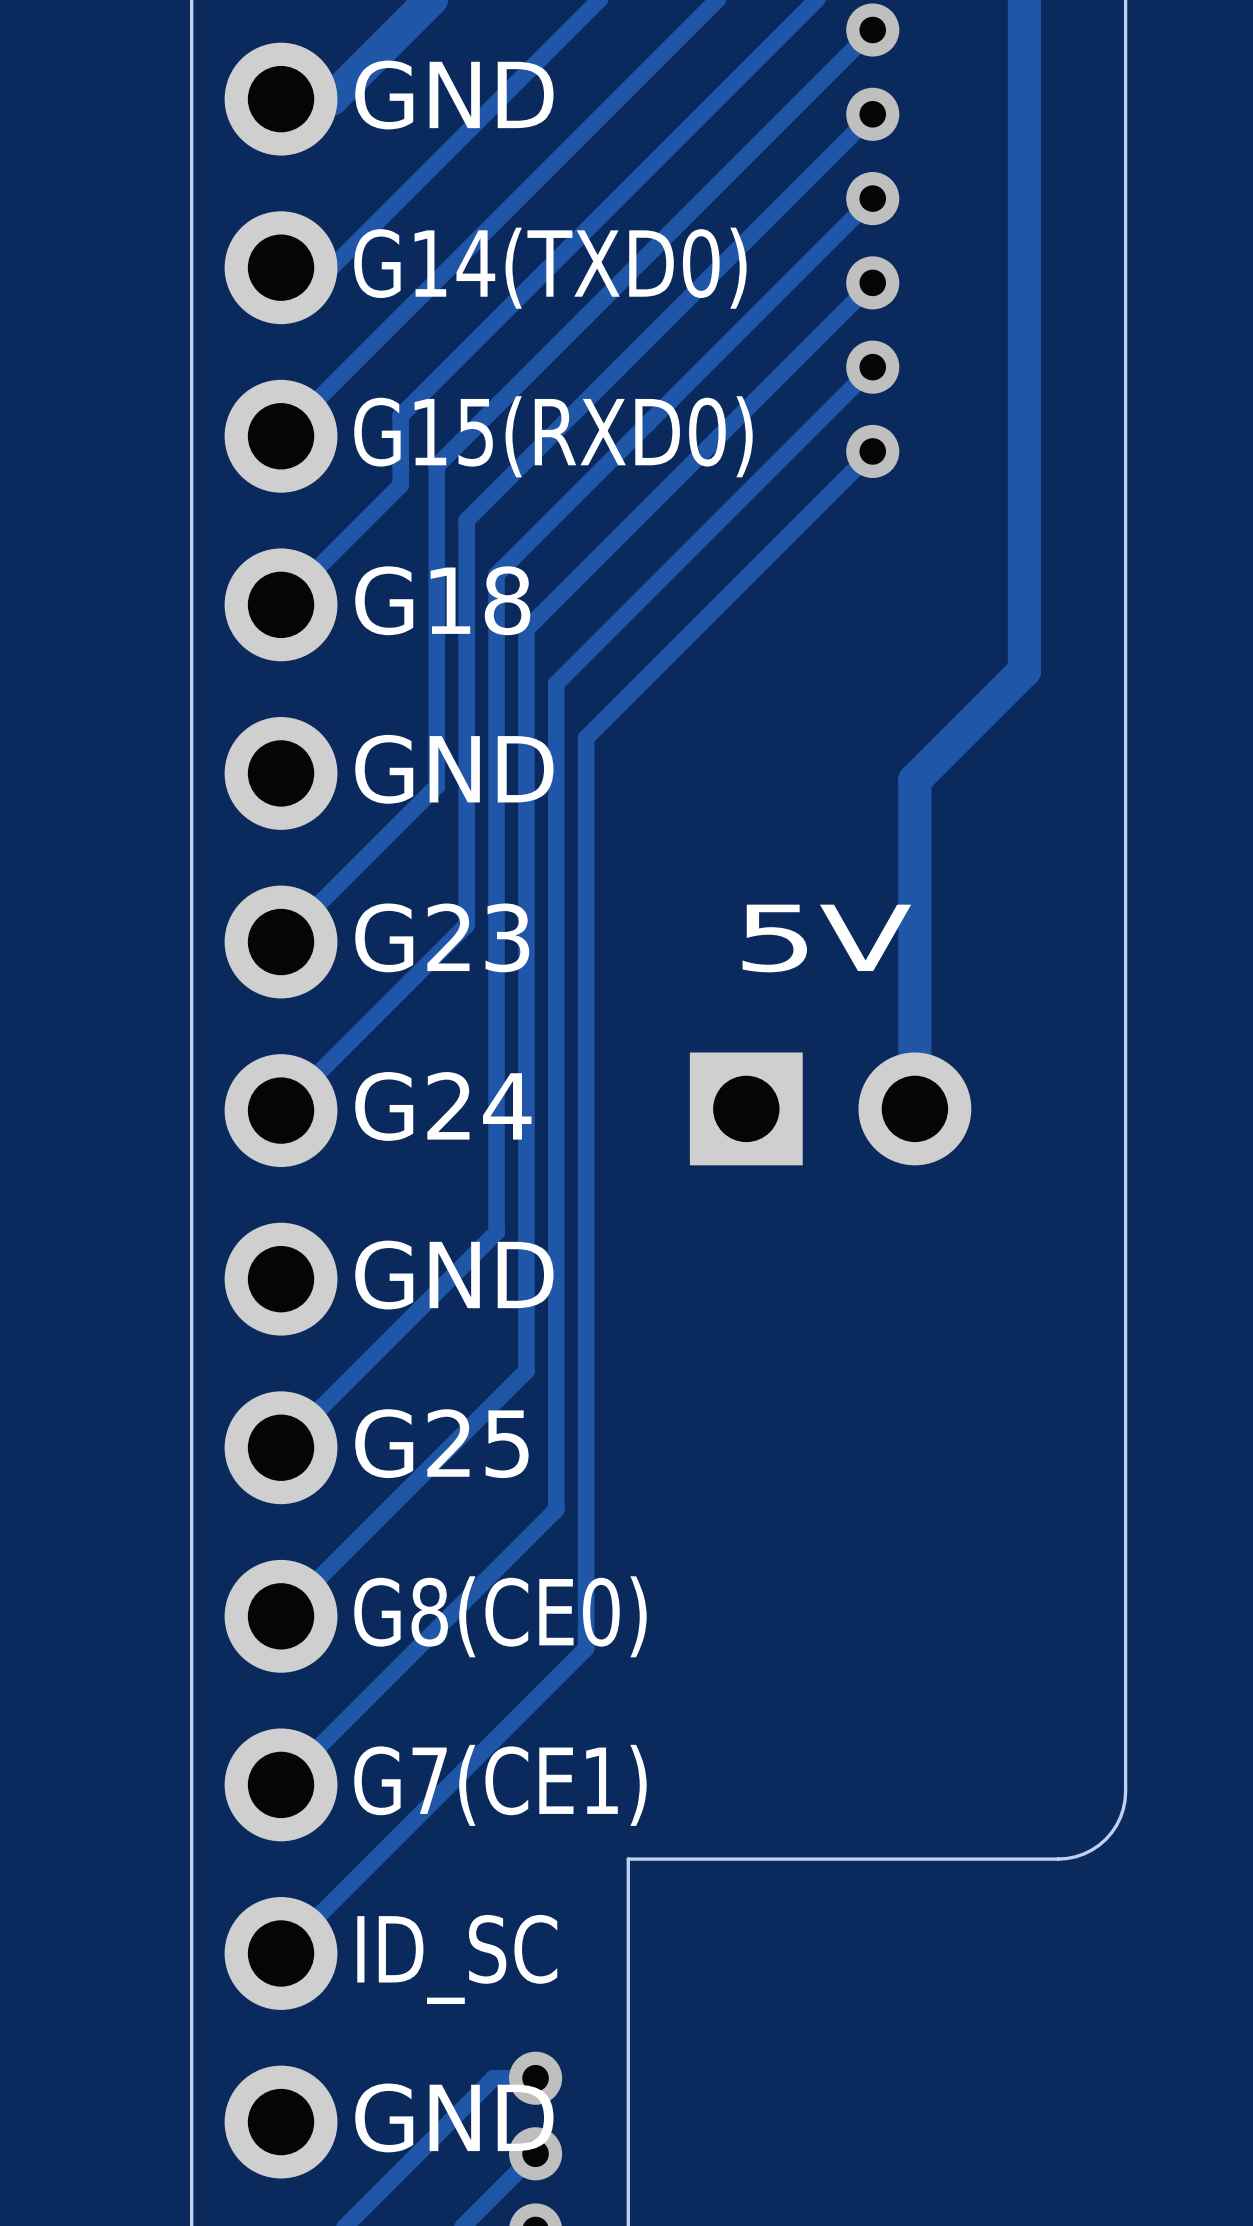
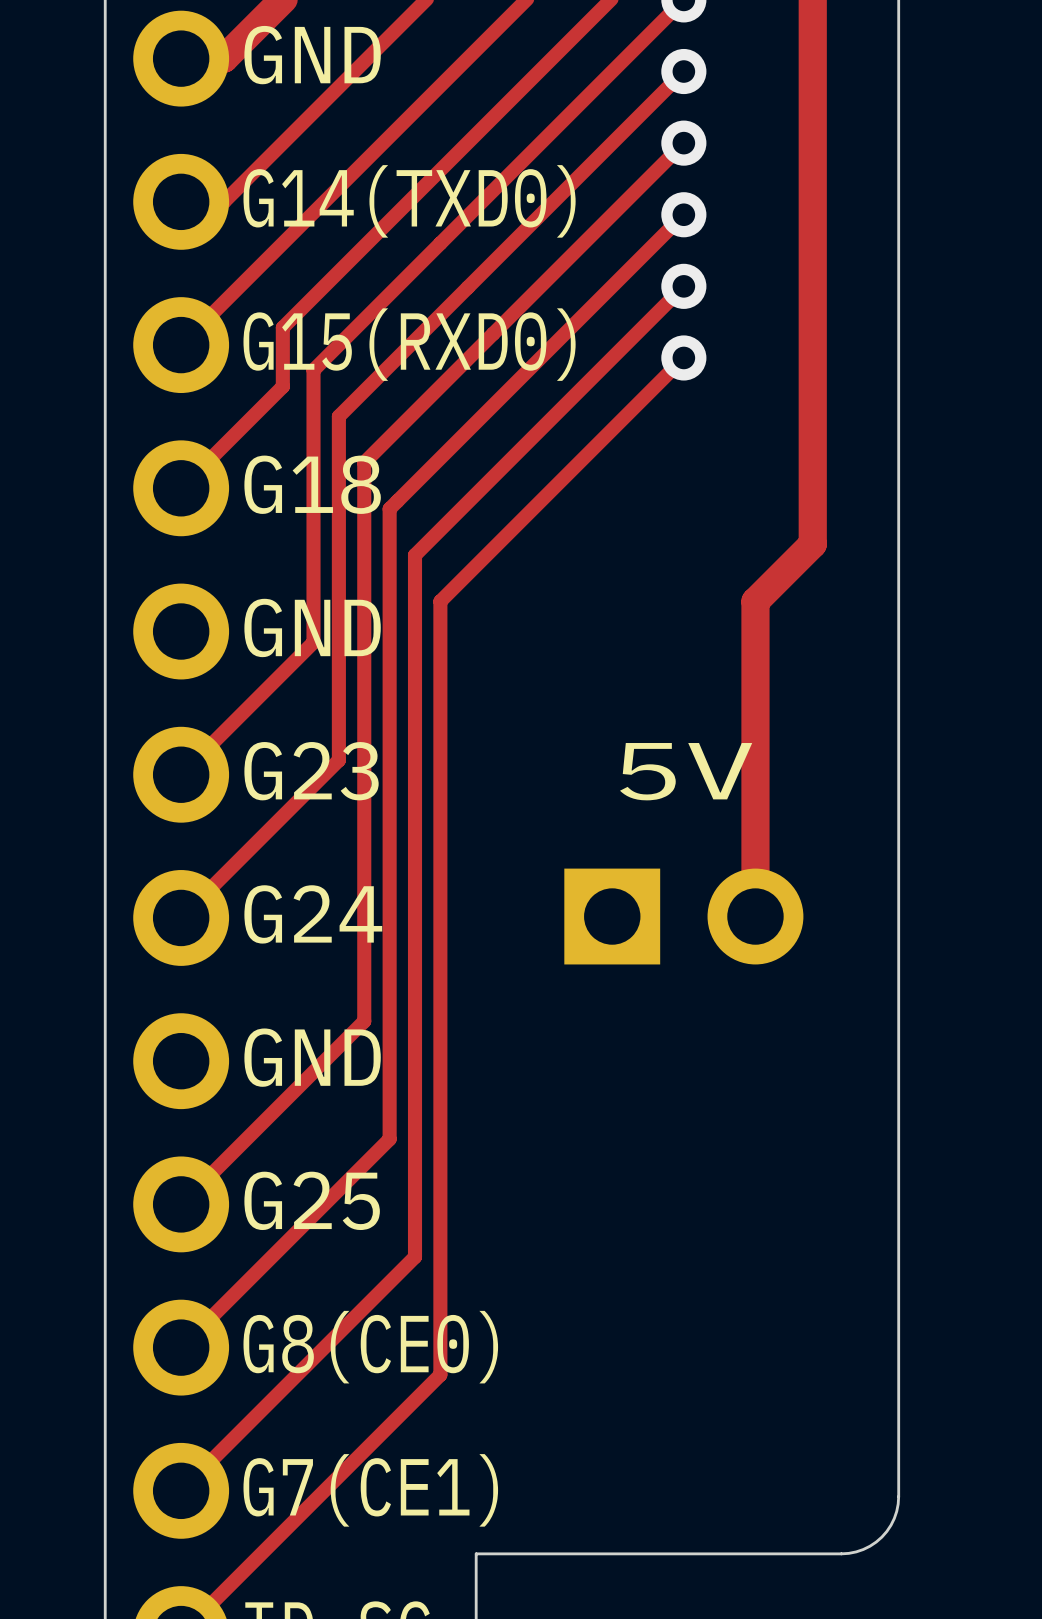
track: (957, 738) (914, 780) (914, 1108) -> (755, 601) (755, 916)
text position: 5V (826, 938) -> 5V (686, 771)
part position: (830, 1108) -> (683, 916)

